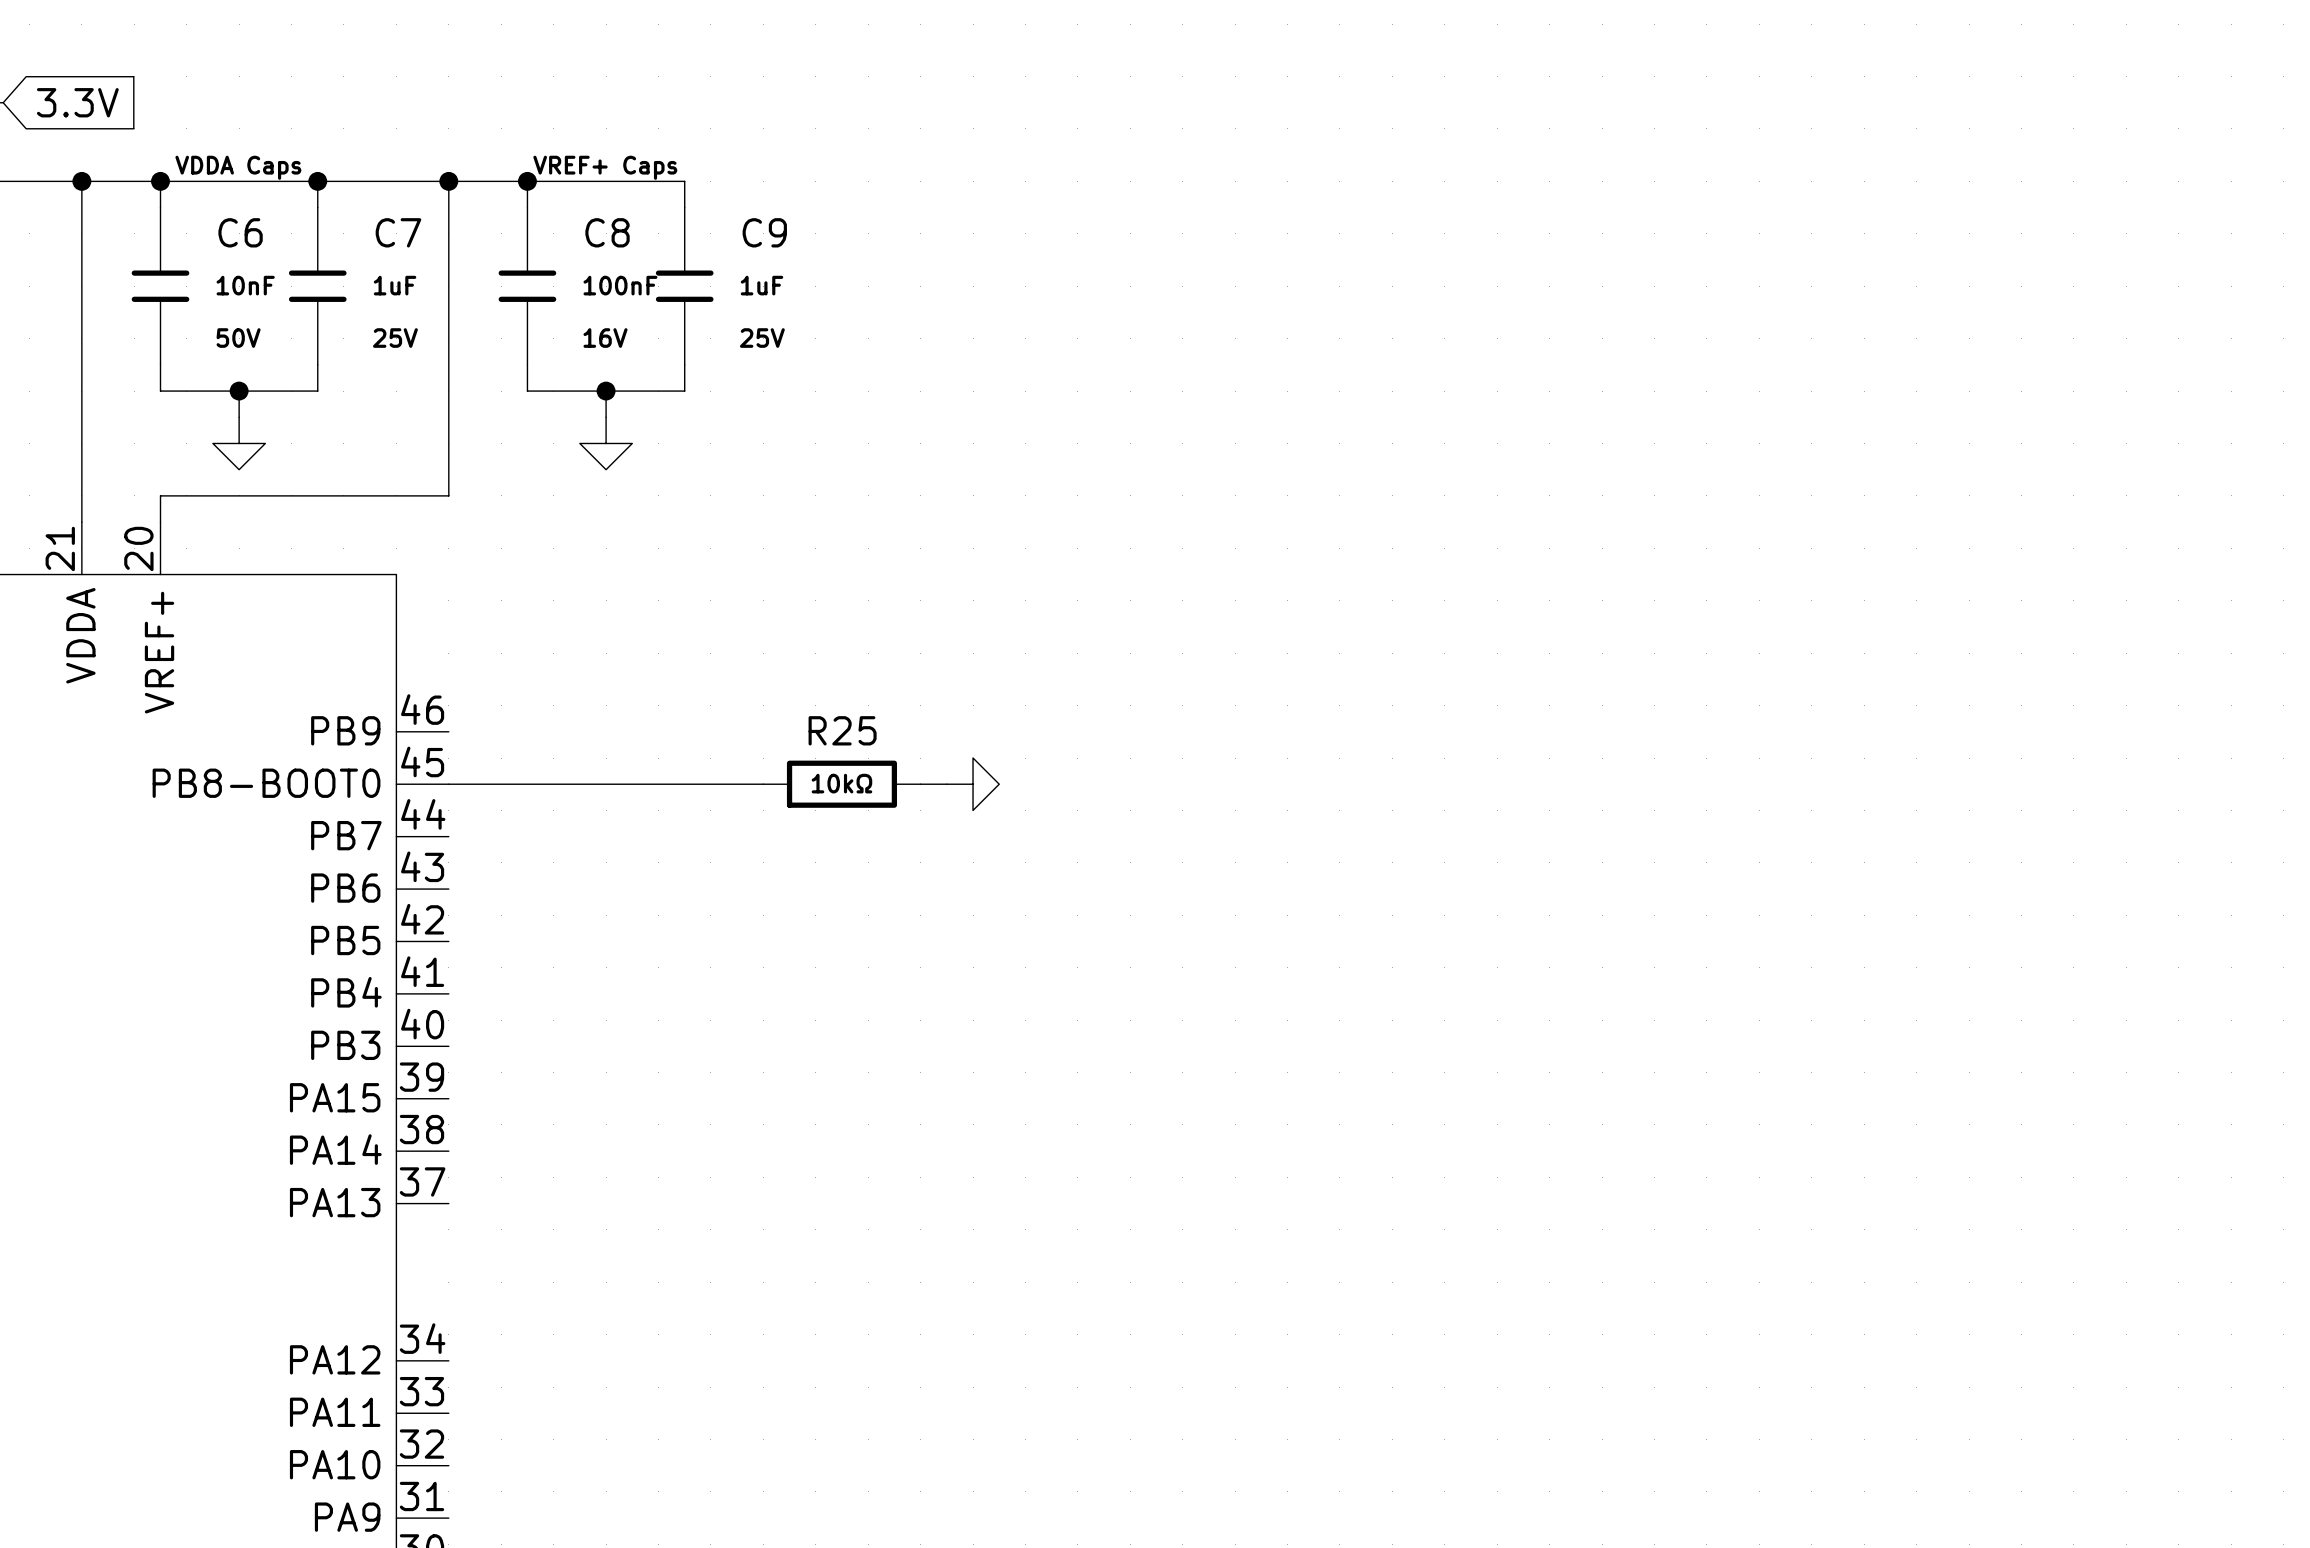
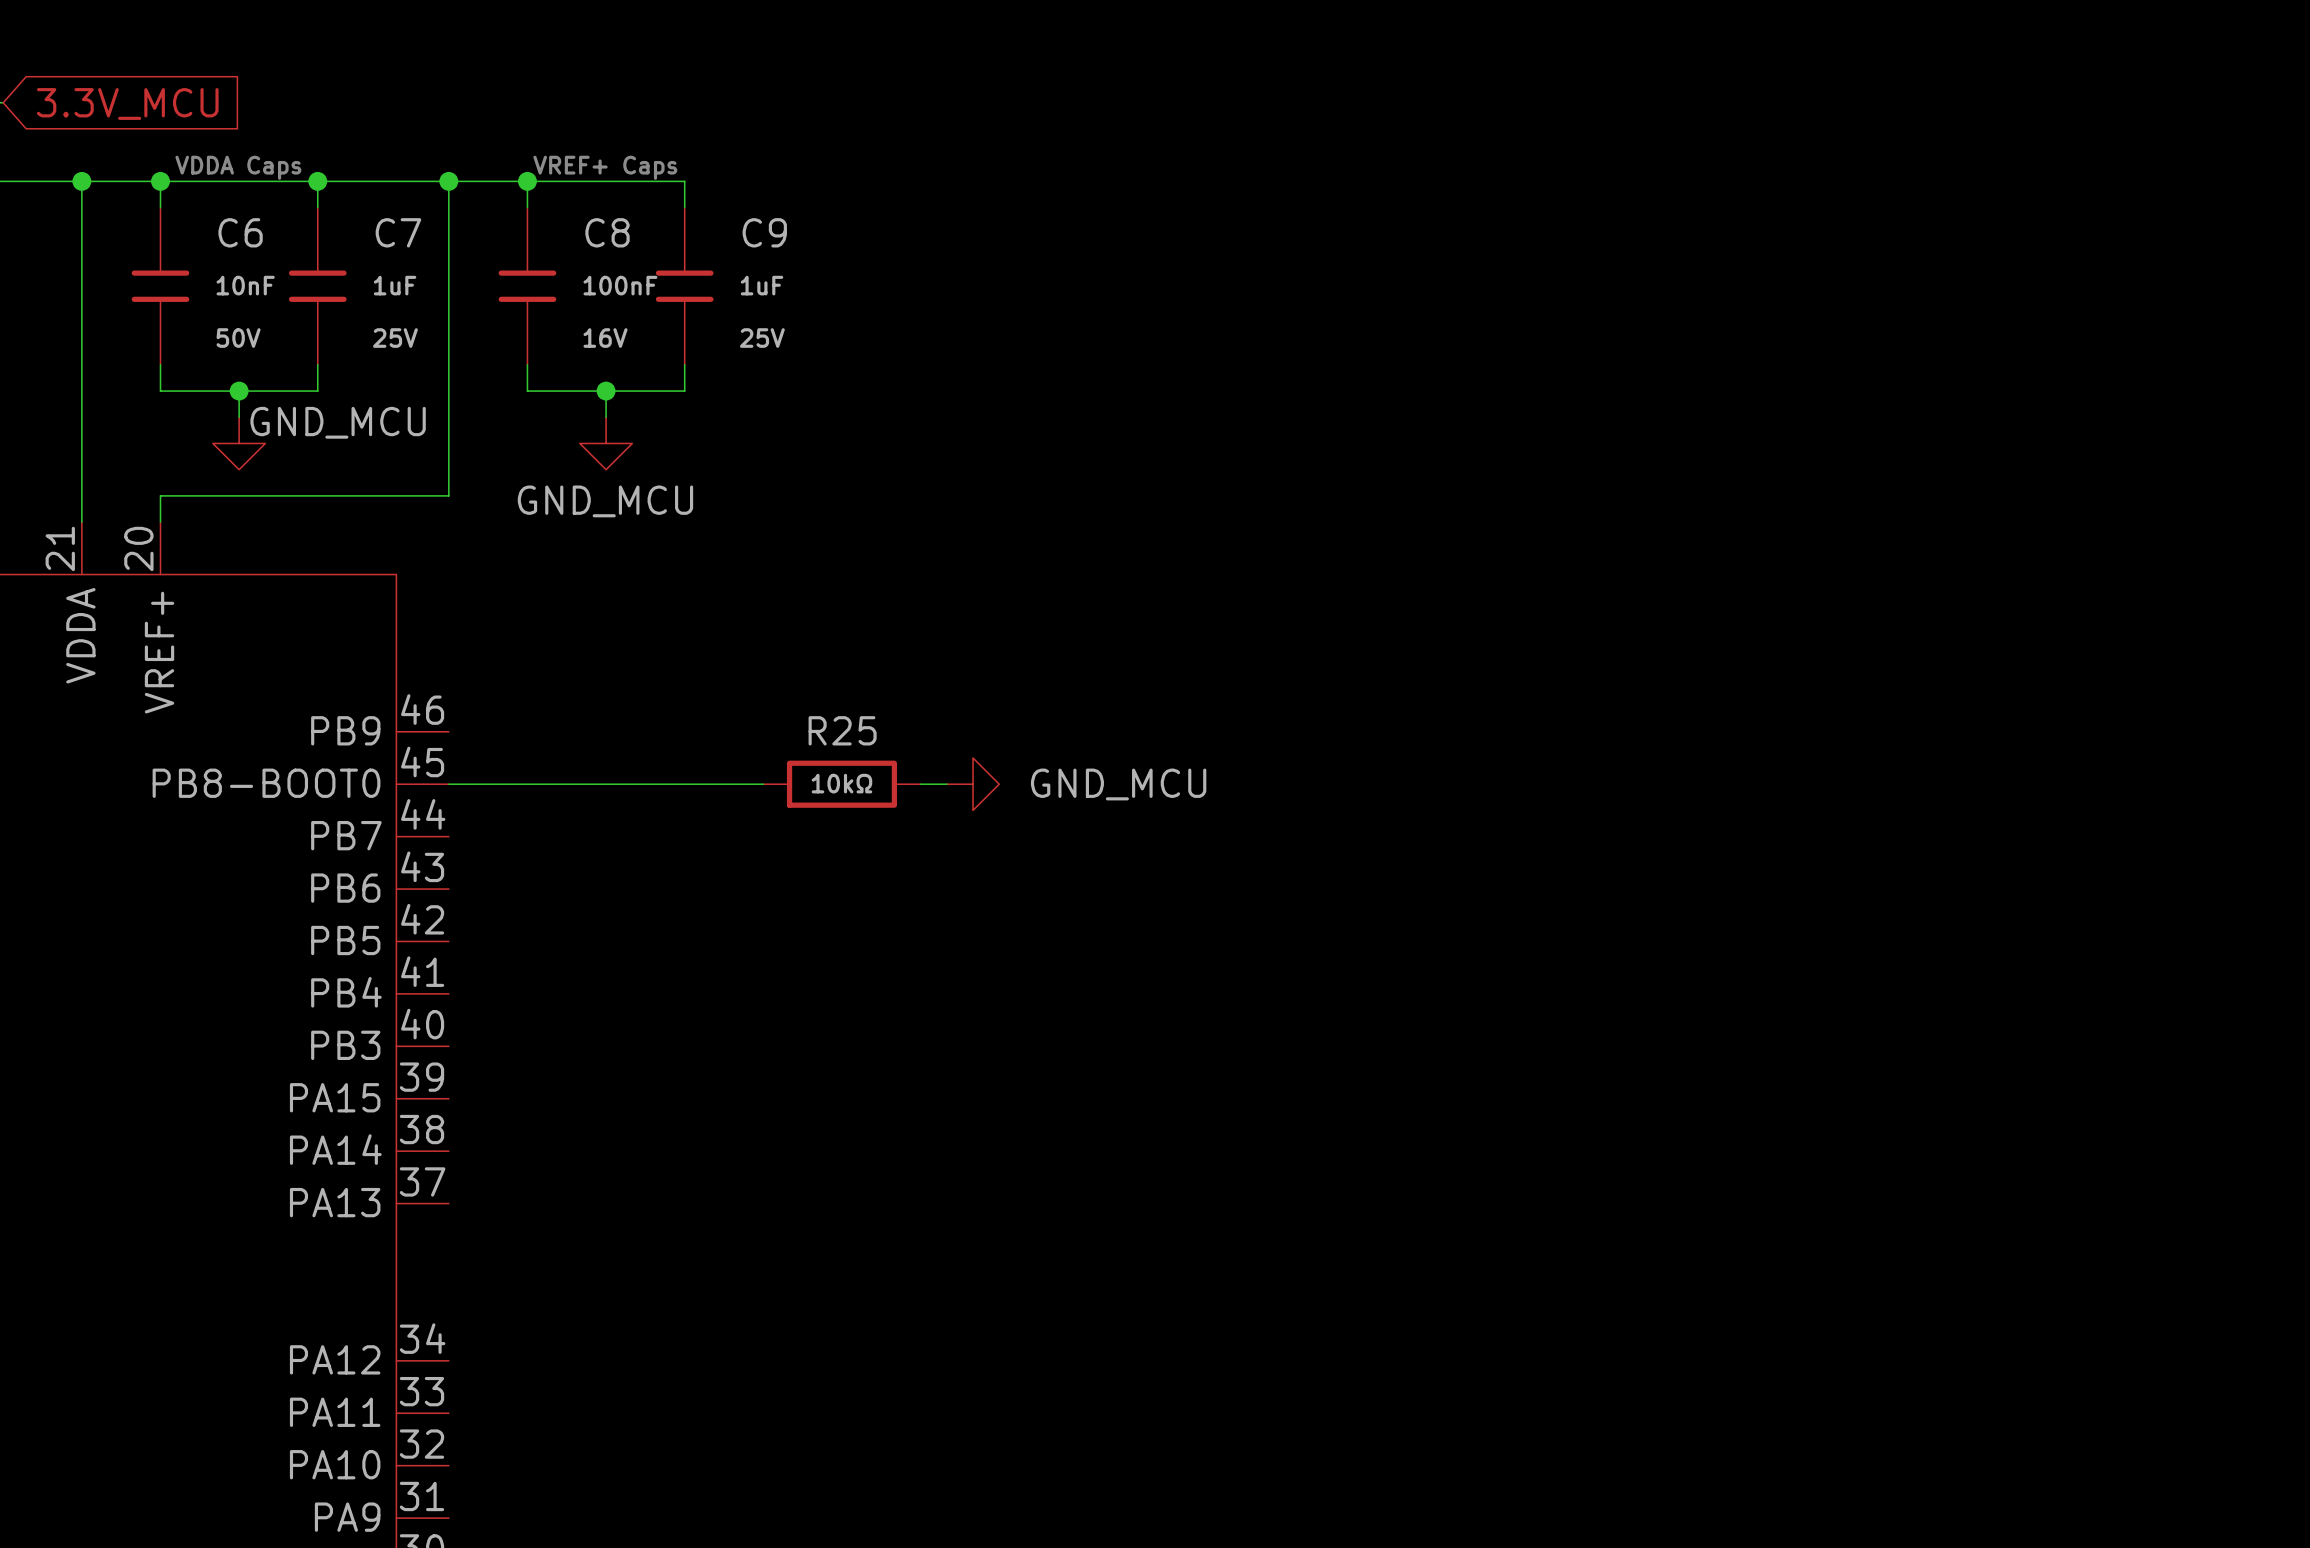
global label: 3.3V (77, 102) -> 3.3V_MCU (127, 103)
power symbol text: none -> GND_MCU (338, 422)
power symbol text: none -> GND_MCU (605, 501)
power symbol text: none -> GND_MCU (1118, 784)

